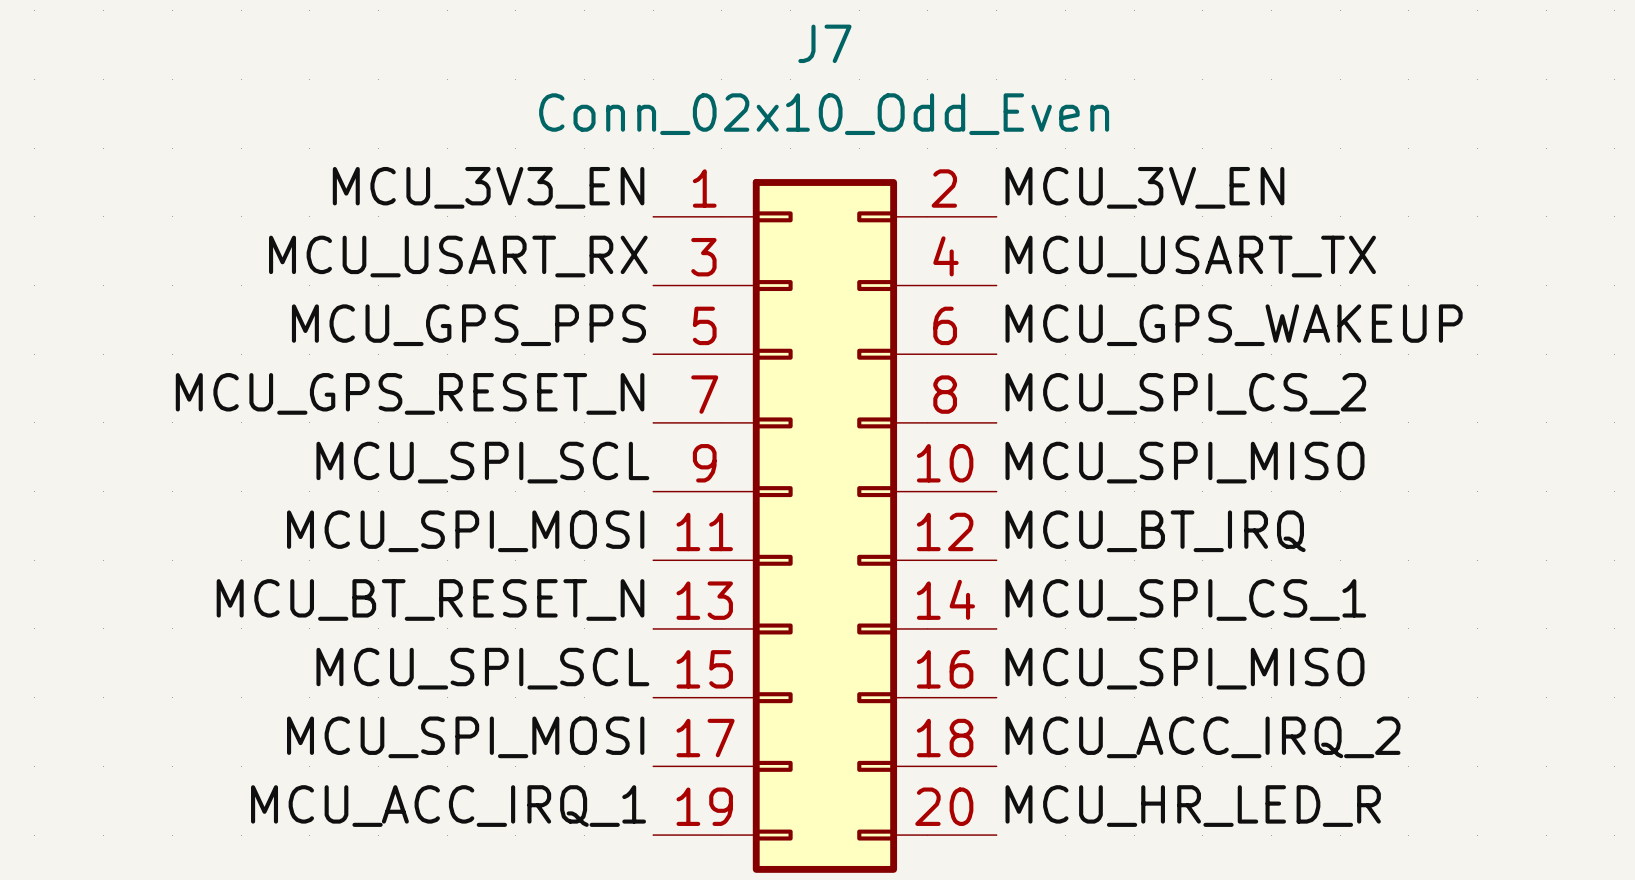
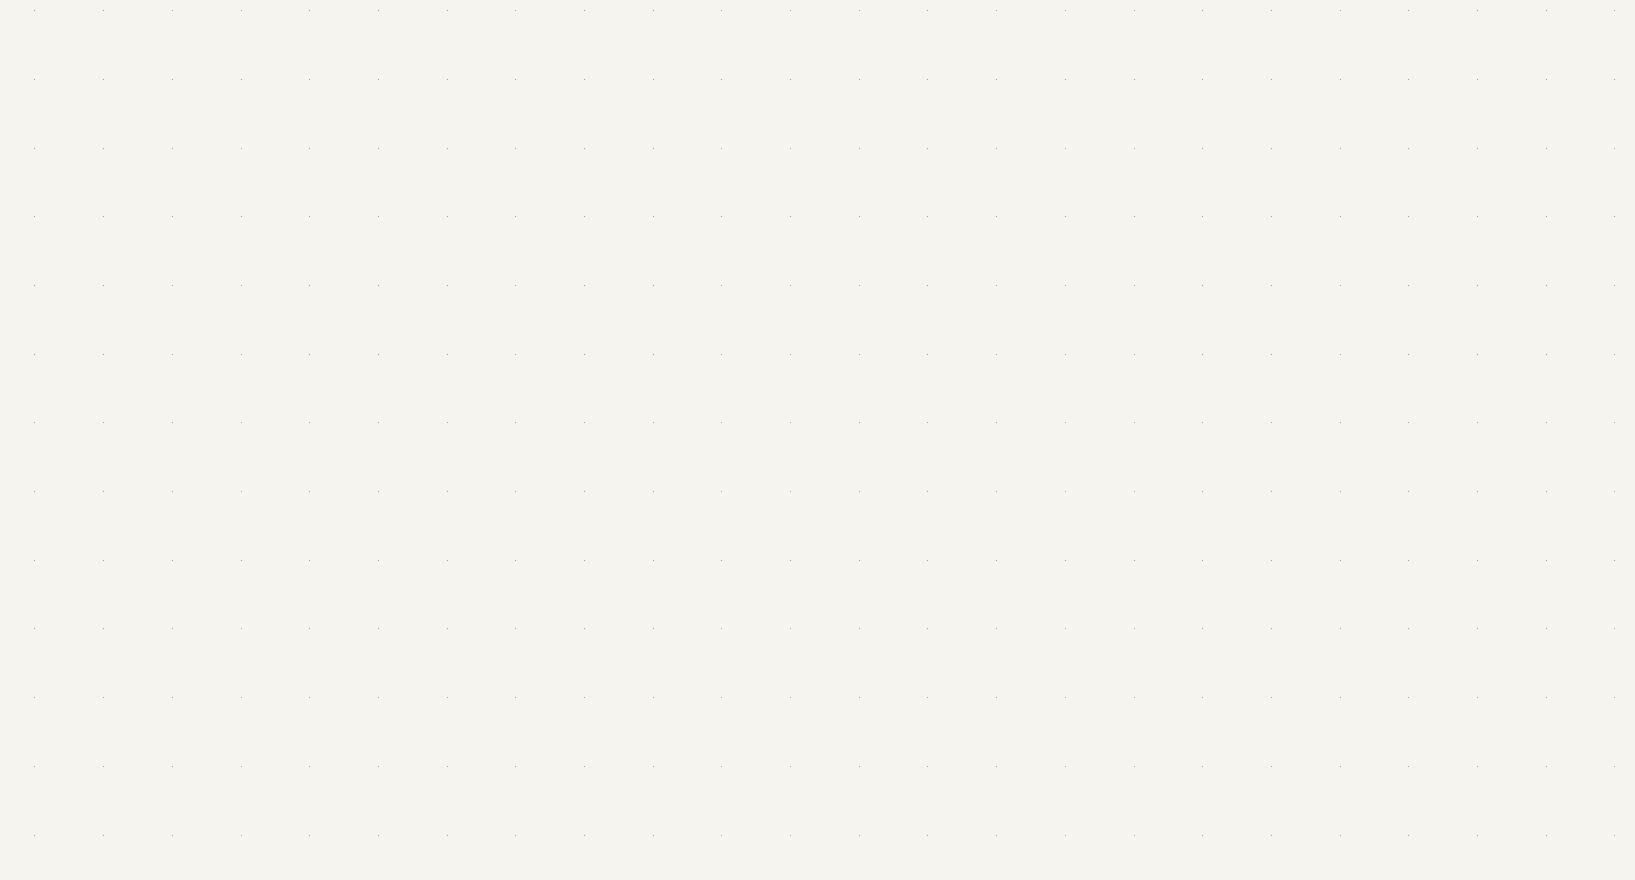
label: MCU_3V3_EN (488, 187) -> none
label: MCU_3V_EN (1144, 187) -> none
label: MCU_USART_RX (458, 256) -> none
label: MCU_USART_TX (1190, 256) -> none
label: MCU_GPS_PPS (468, 325) -> none
label: MCU_GPS_WAKEUP (1234, 325) -> none
label: MCU_GPS_RESET_N (410, 393) -> none
label: MCU_SPI_CS_2 (1185, 393) -> none
label: MCU_SPI_SCL (482, 462) -> none
label: MCU_SPI_MISO (1185, 462) -> none
J7: Conn_02x10_Odd_Even (824, 525) -> none
label: MCU_SPI_MOSI (465, 531) -> none
label: MCU_BT_IRQ (1155, 531) -> none
label: MCU_BT_RESET_N (430, 599) -> none
label: MCU_SPI_CS_1 (1185, 599) -> none
label: MCU_SPI_SCL (482, 668) -> none
label: MCU_SPI_MISO (1185, 668) -> none
label: MCU_SPI_MOSI (465, 737) -> none
label: MCU_ACC_IRQ_2 (1202, 737) -> none
label: MCU_ACC_IRQ_1 (448, 806) -> none
label: MCU_HR_LED_R (1193, 806) -> none

